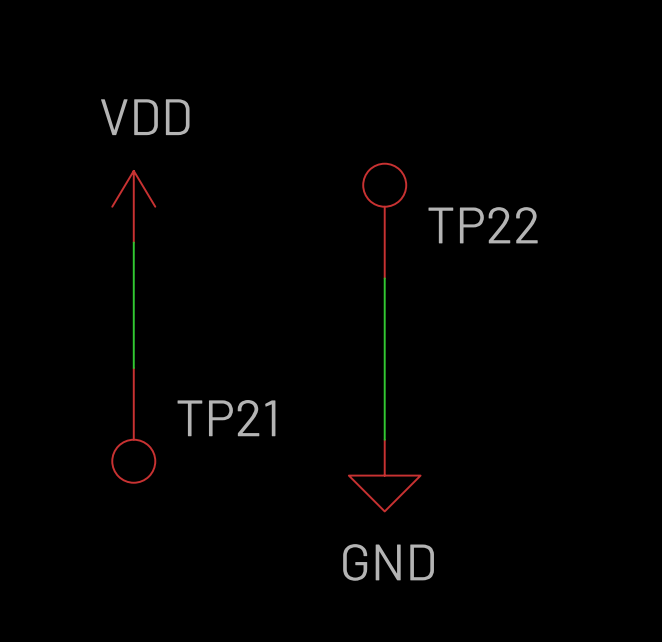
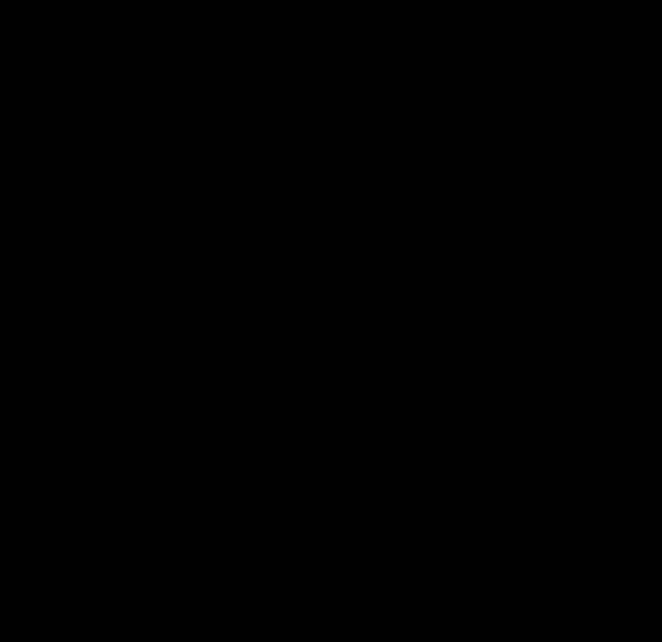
power symbol: VDD (133, 206) -> none
TP22: (384, 221) -> none
wire: (133, 242) (133, 368) -> none
wire: (384, 278) (384, 439) -> none
TP21: (133, 425) -> none
power symbol: GND (384, 475) -> none

